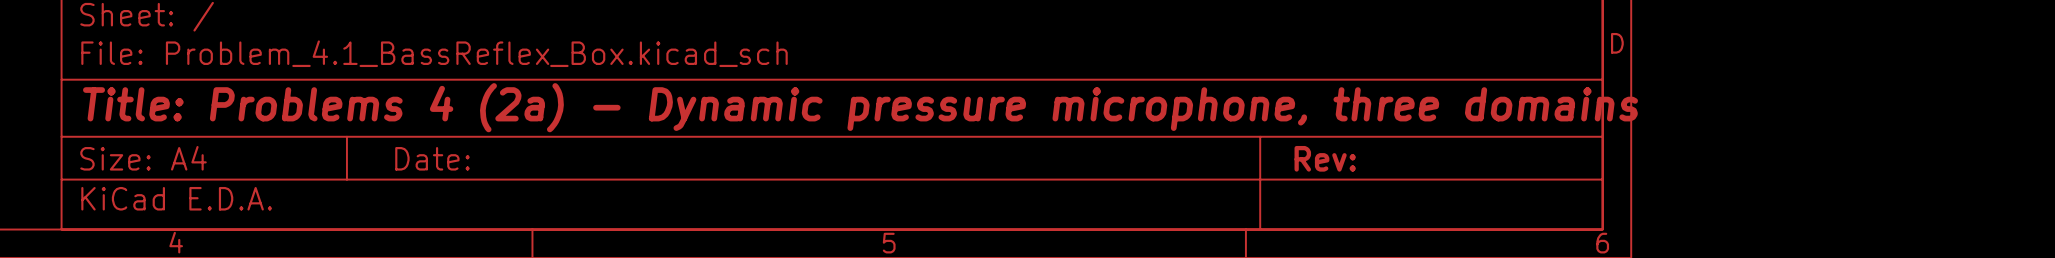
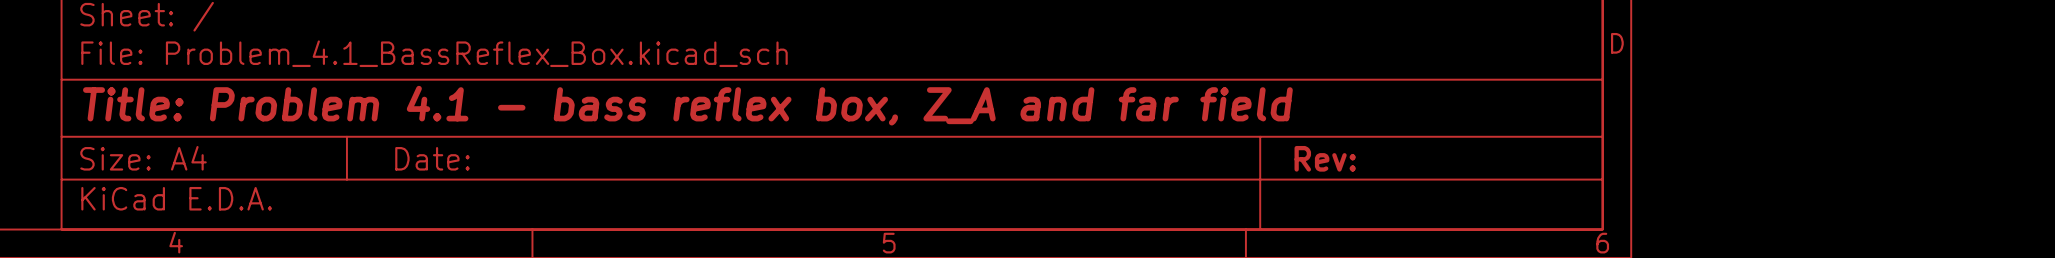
title block: Title: Problems 4 (2a) - Dynamic pressure microphone, three domains (860, 107) -> Title: Problem 4.1 - bass reflex box, Z_A and far field (687, 105)

